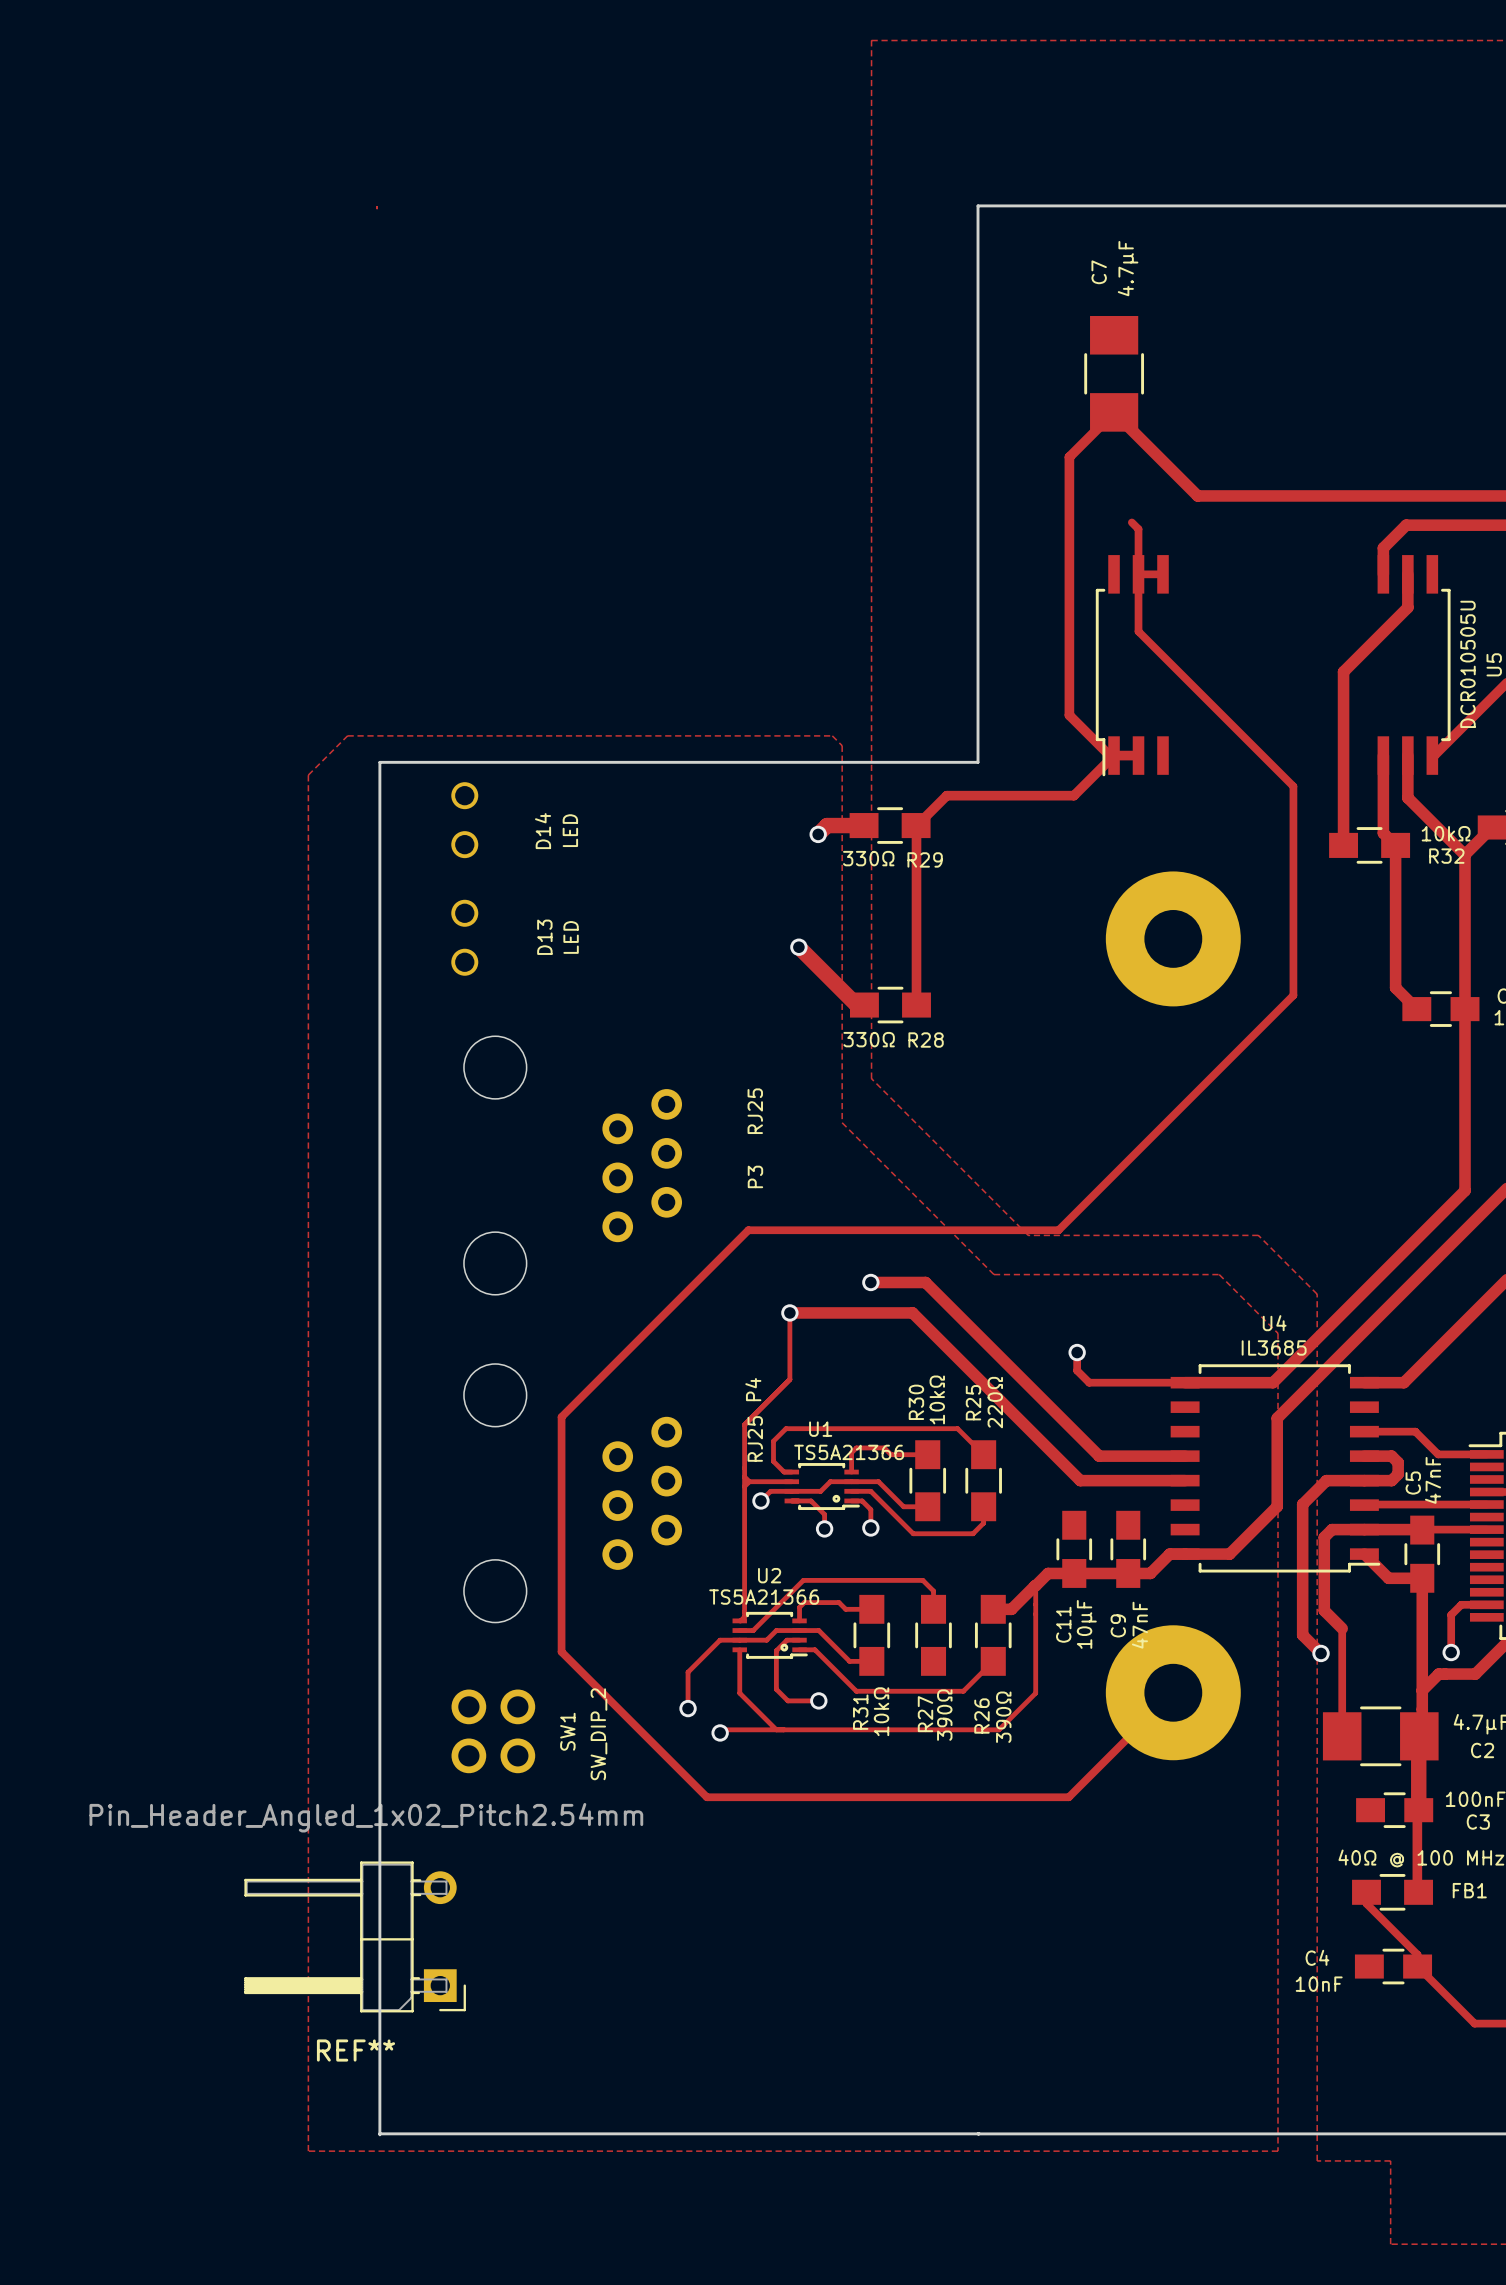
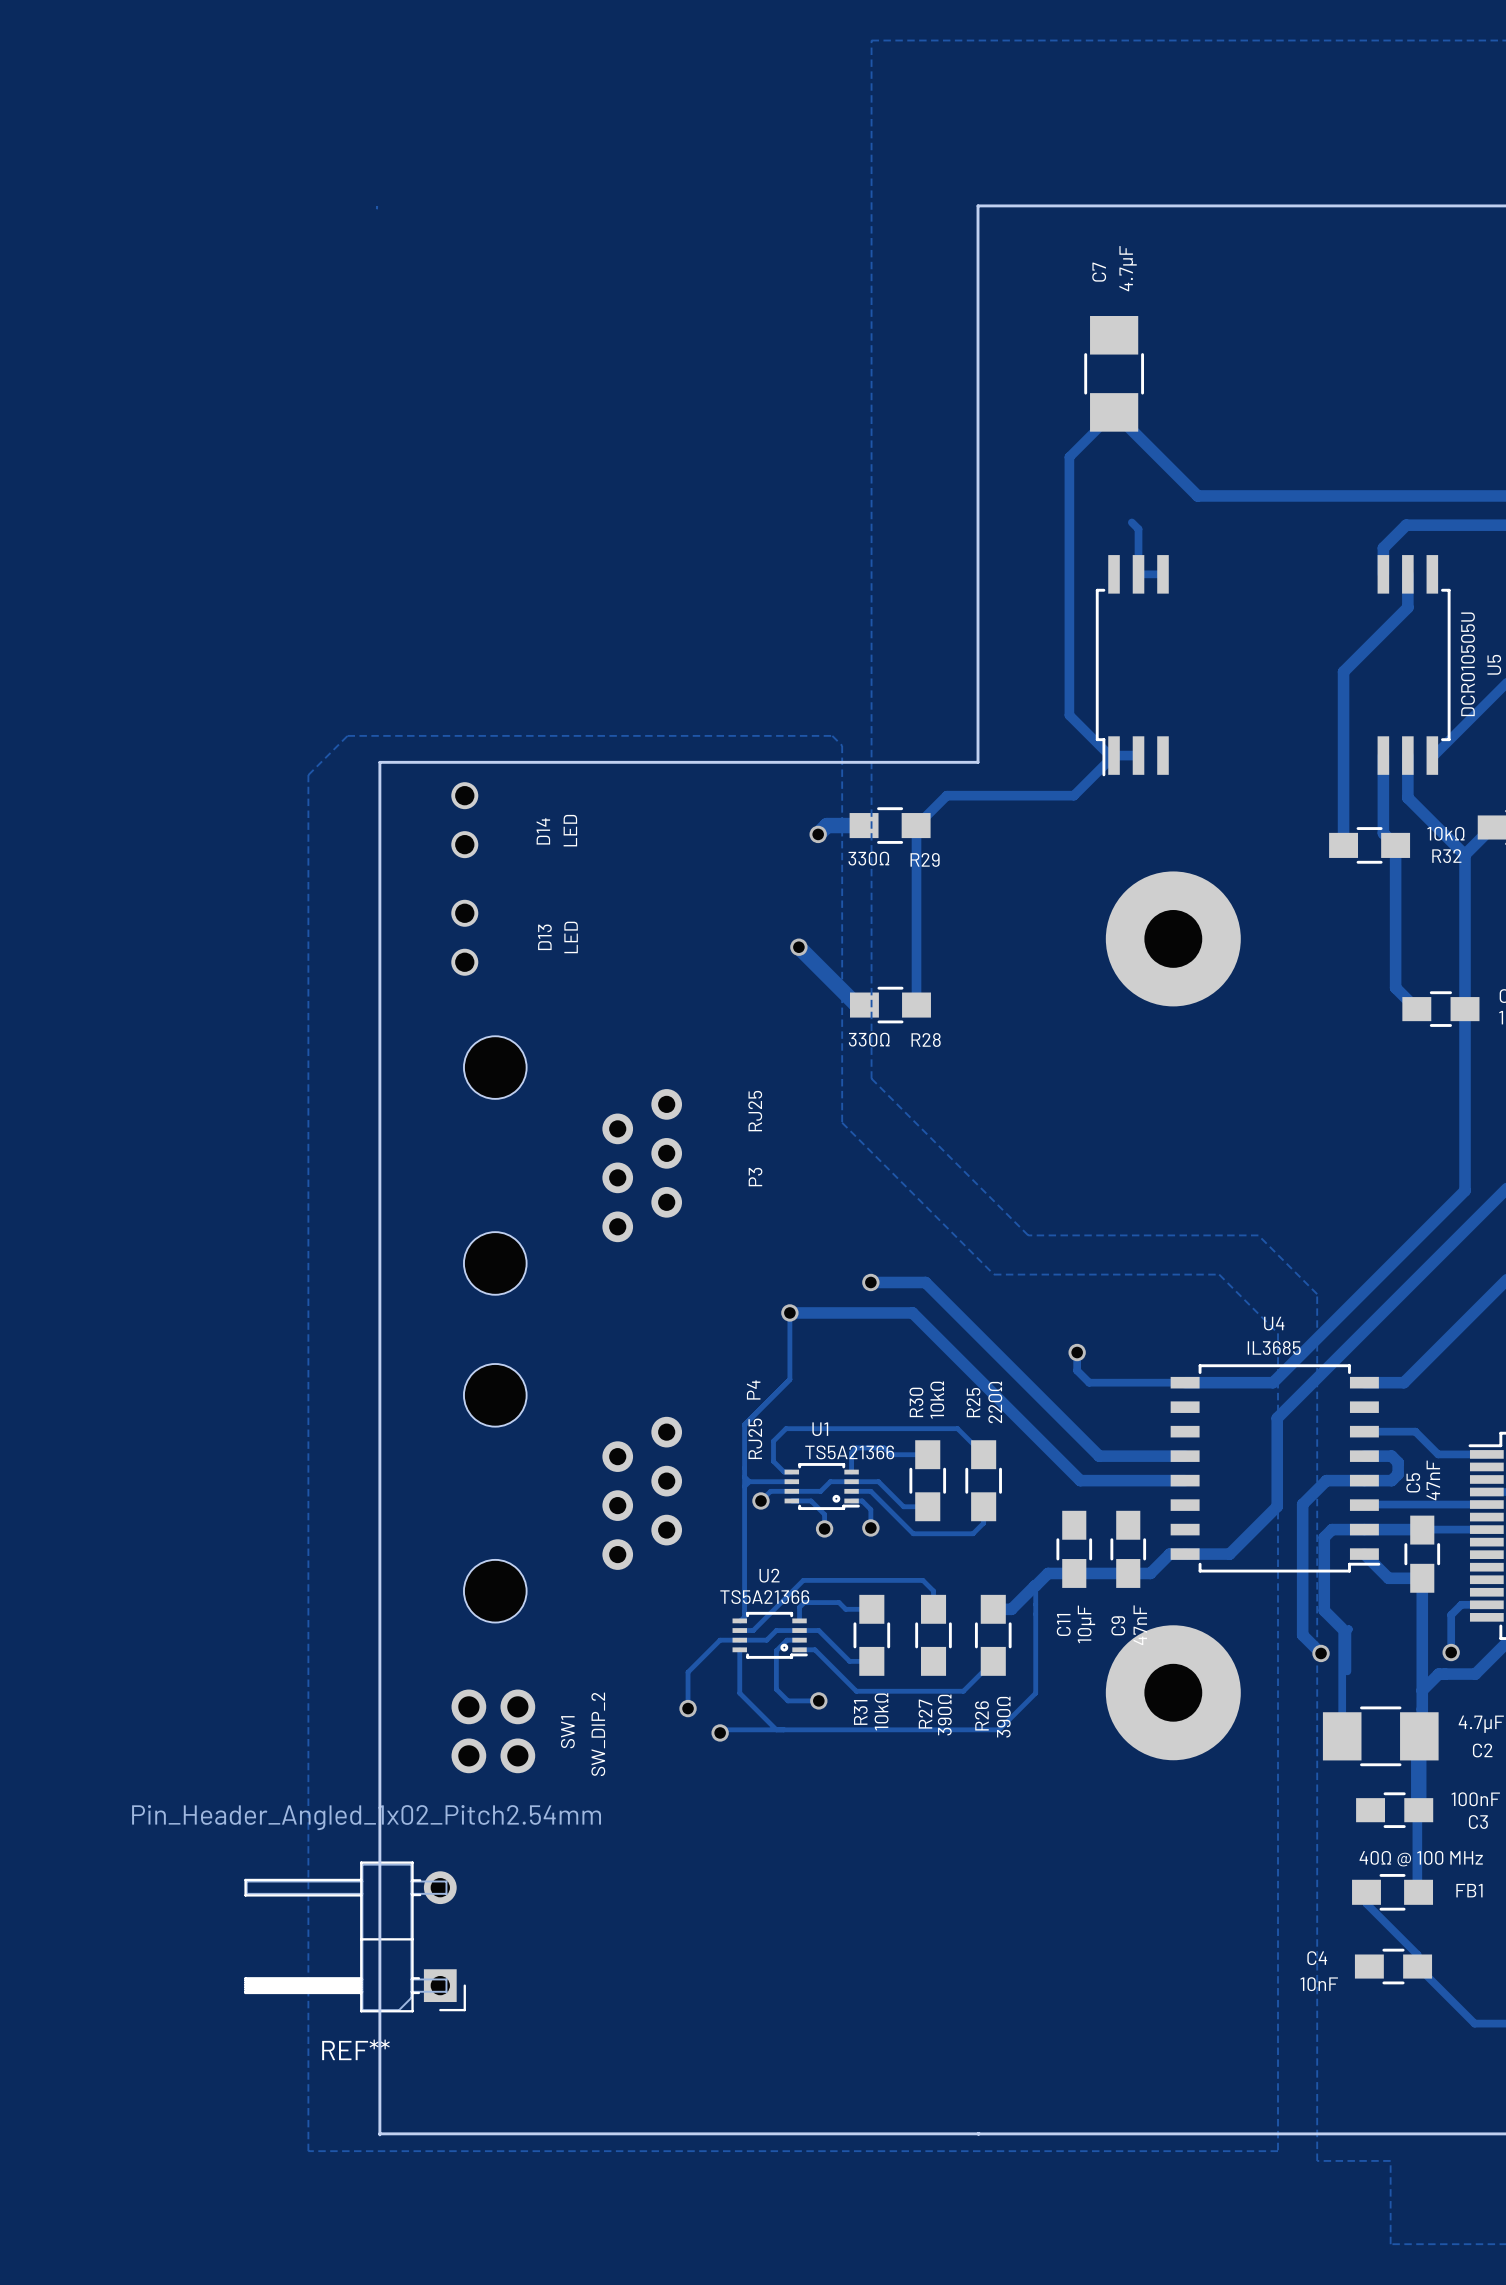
track: (1138, 574) (1138, 631) (1293, 786) (1293, 995) (1058, 1230) (748, 1230) (561, 1417) (561, 1651) (706, 1797) (1068, 1797) (1173, 1692) -> none
track: none -> (1348, 1629) (1347, 1671)

